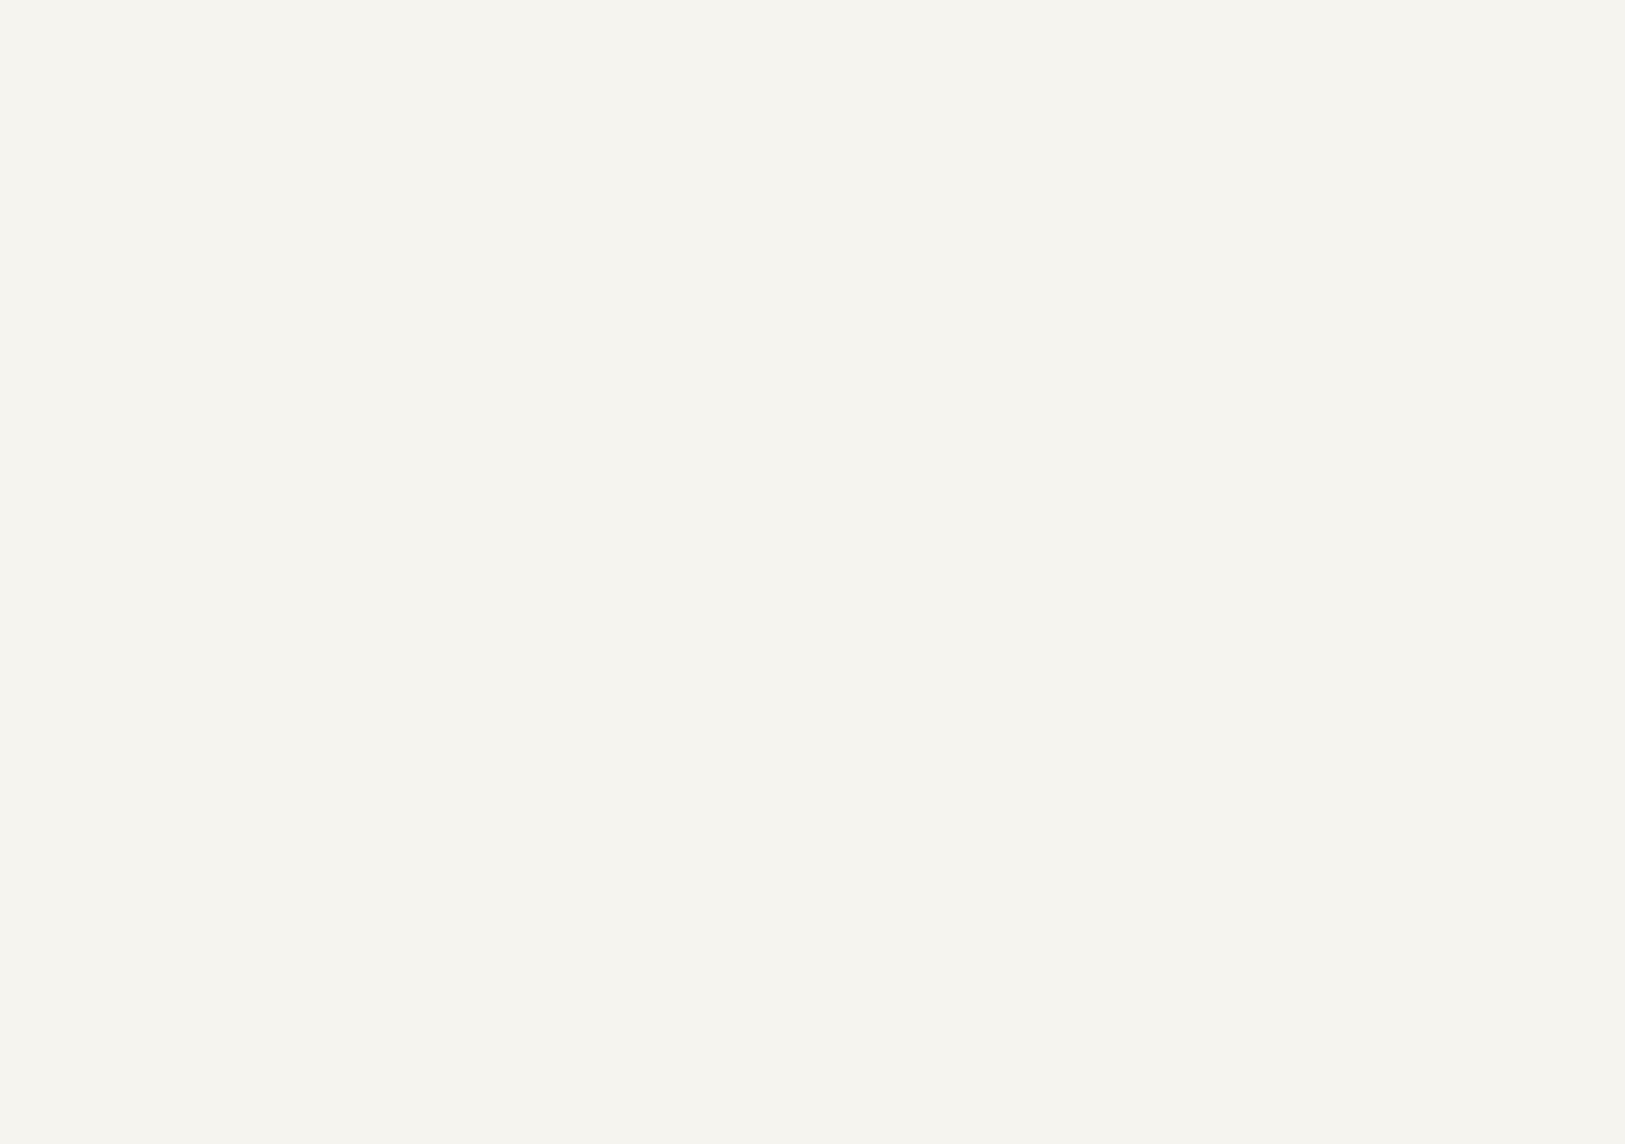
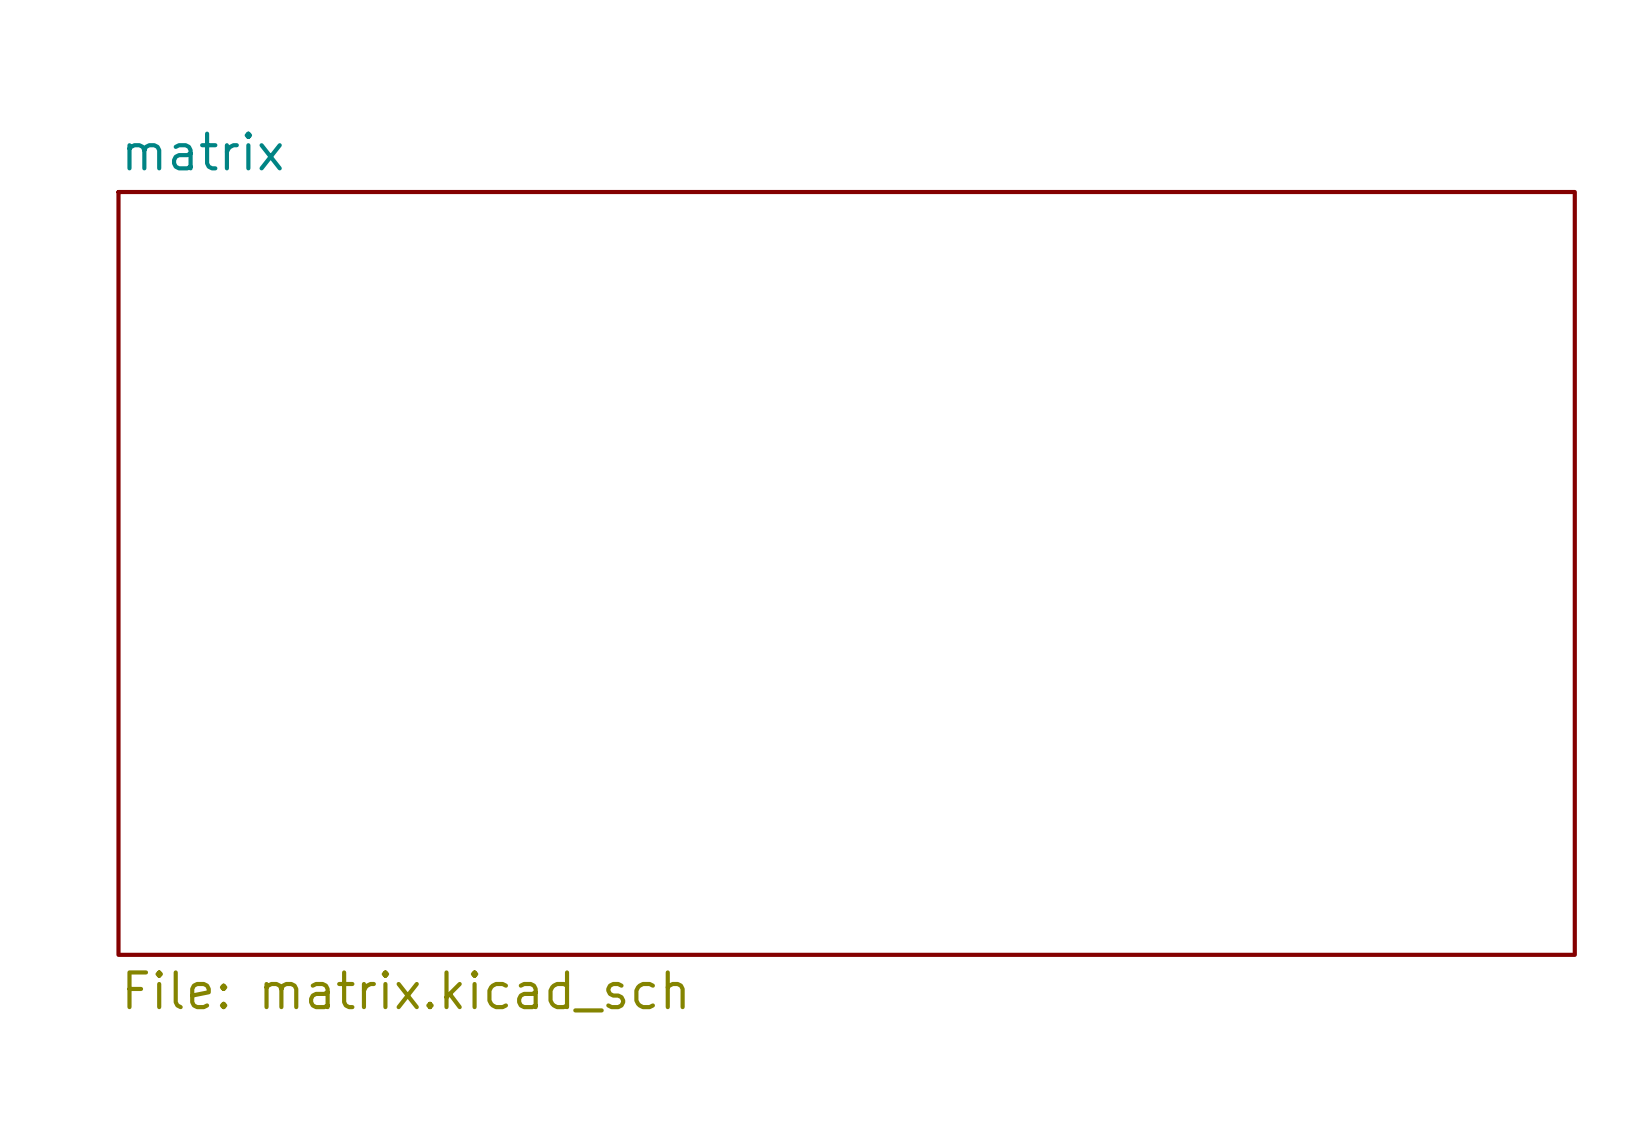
sheet matrix: none -> File: matrix.kicad_sch (846, 573)

